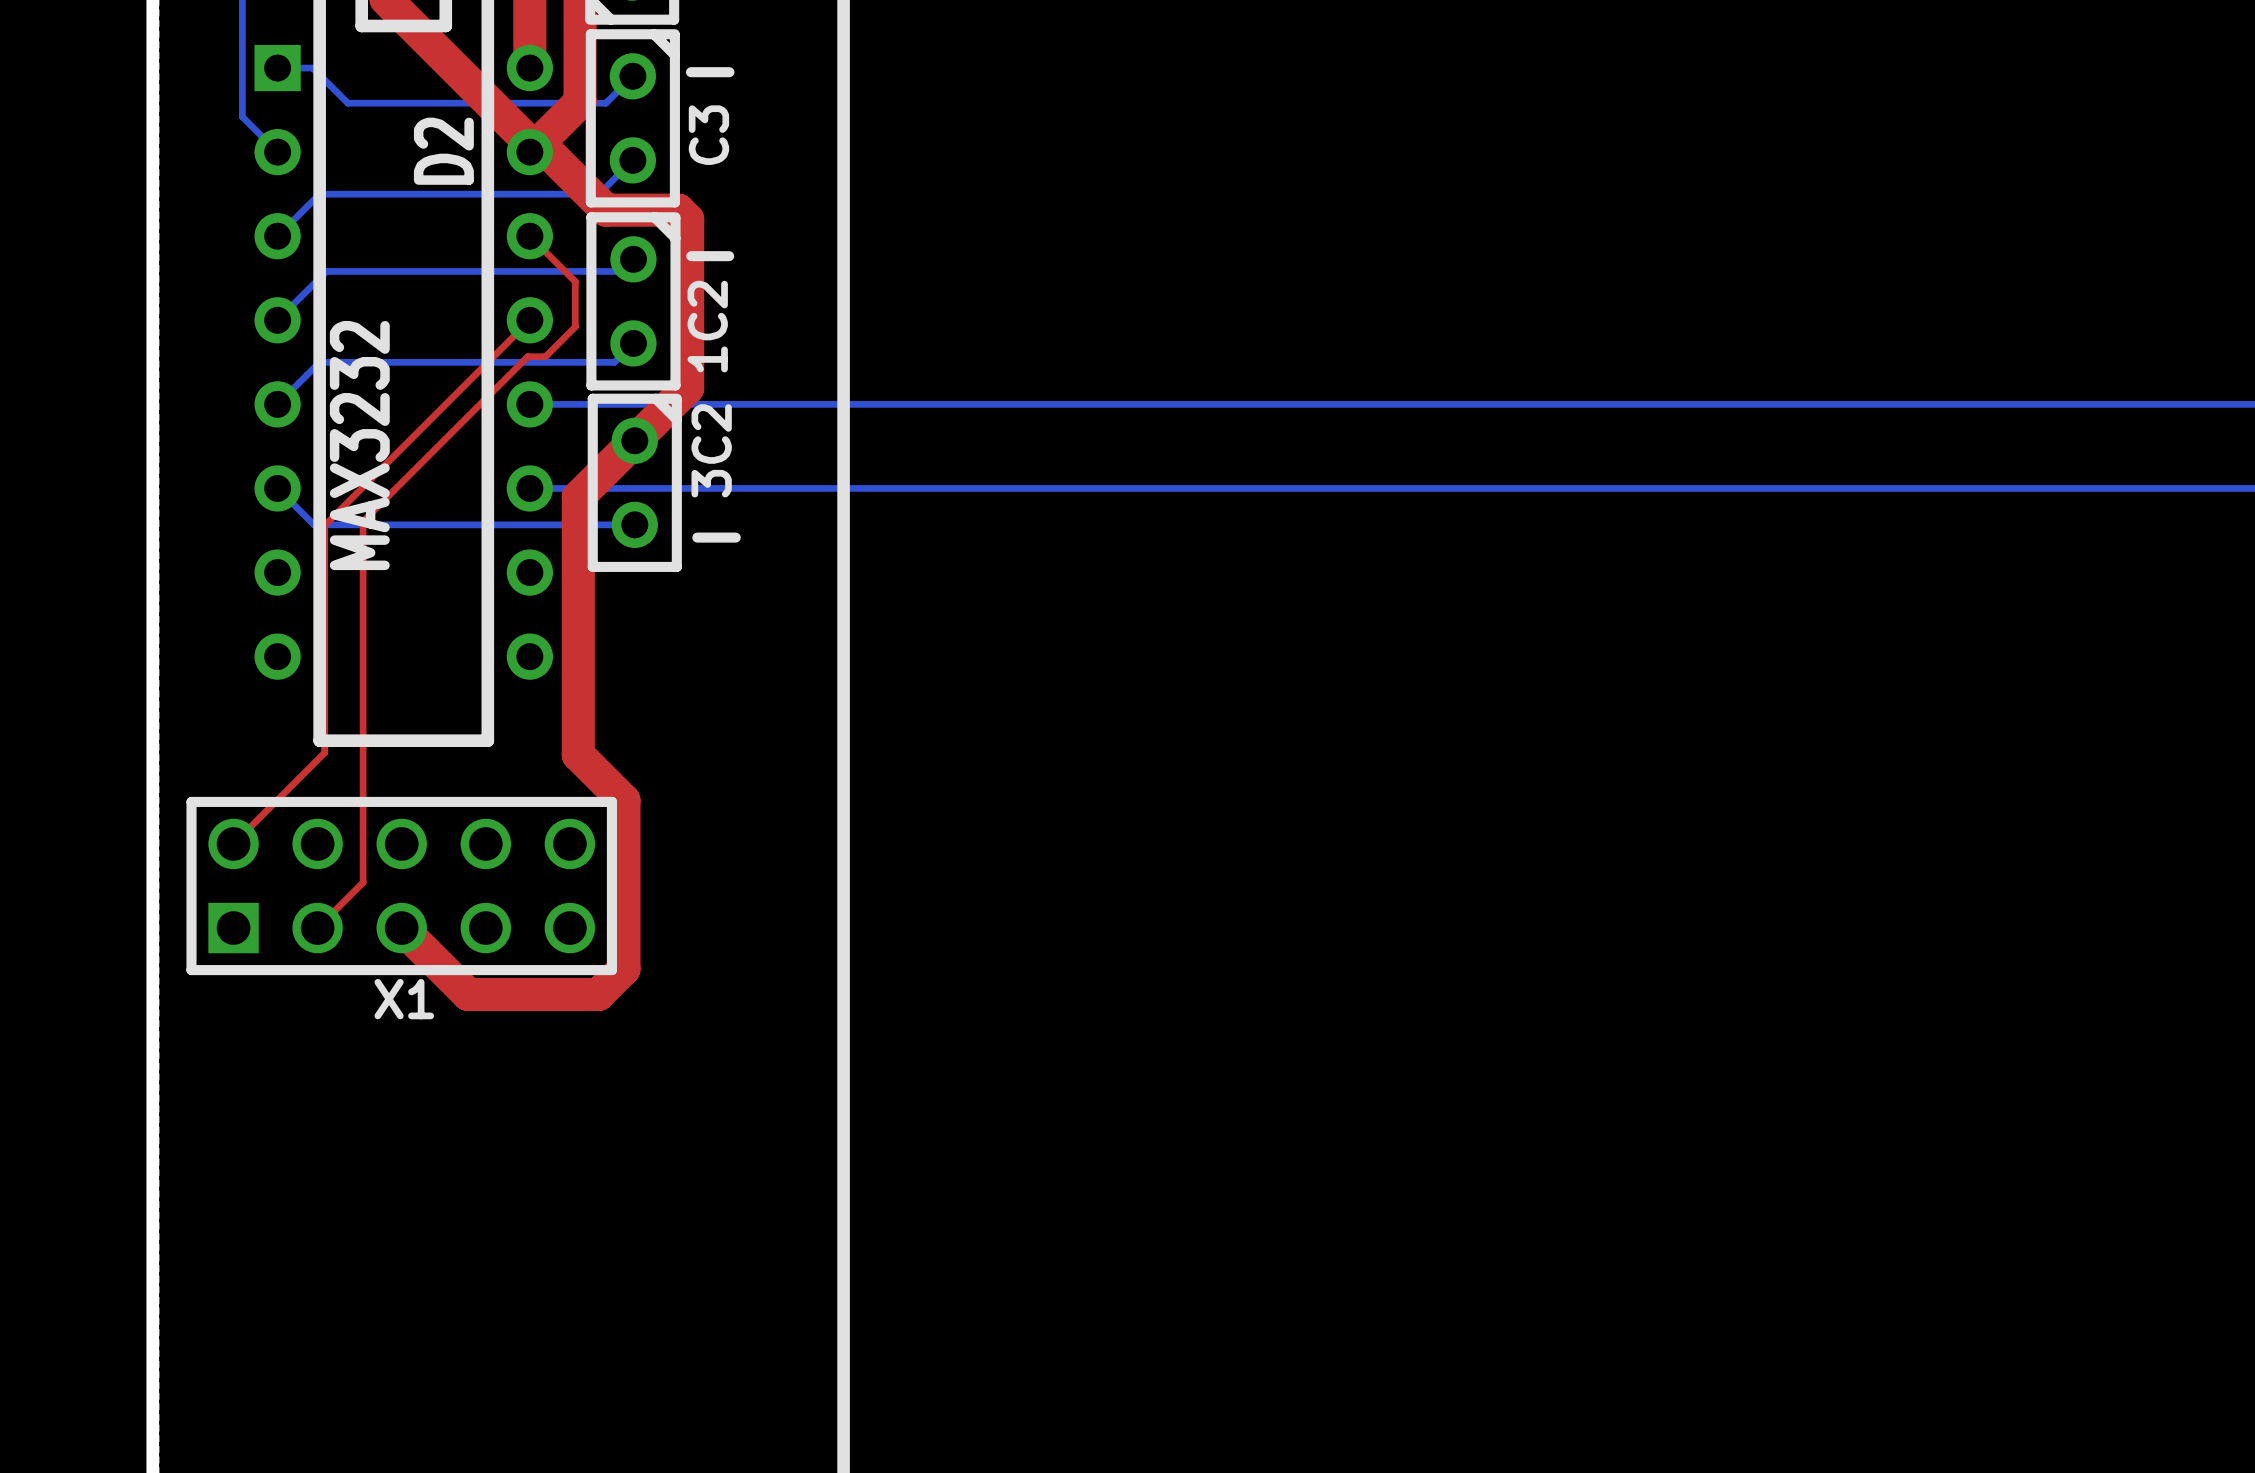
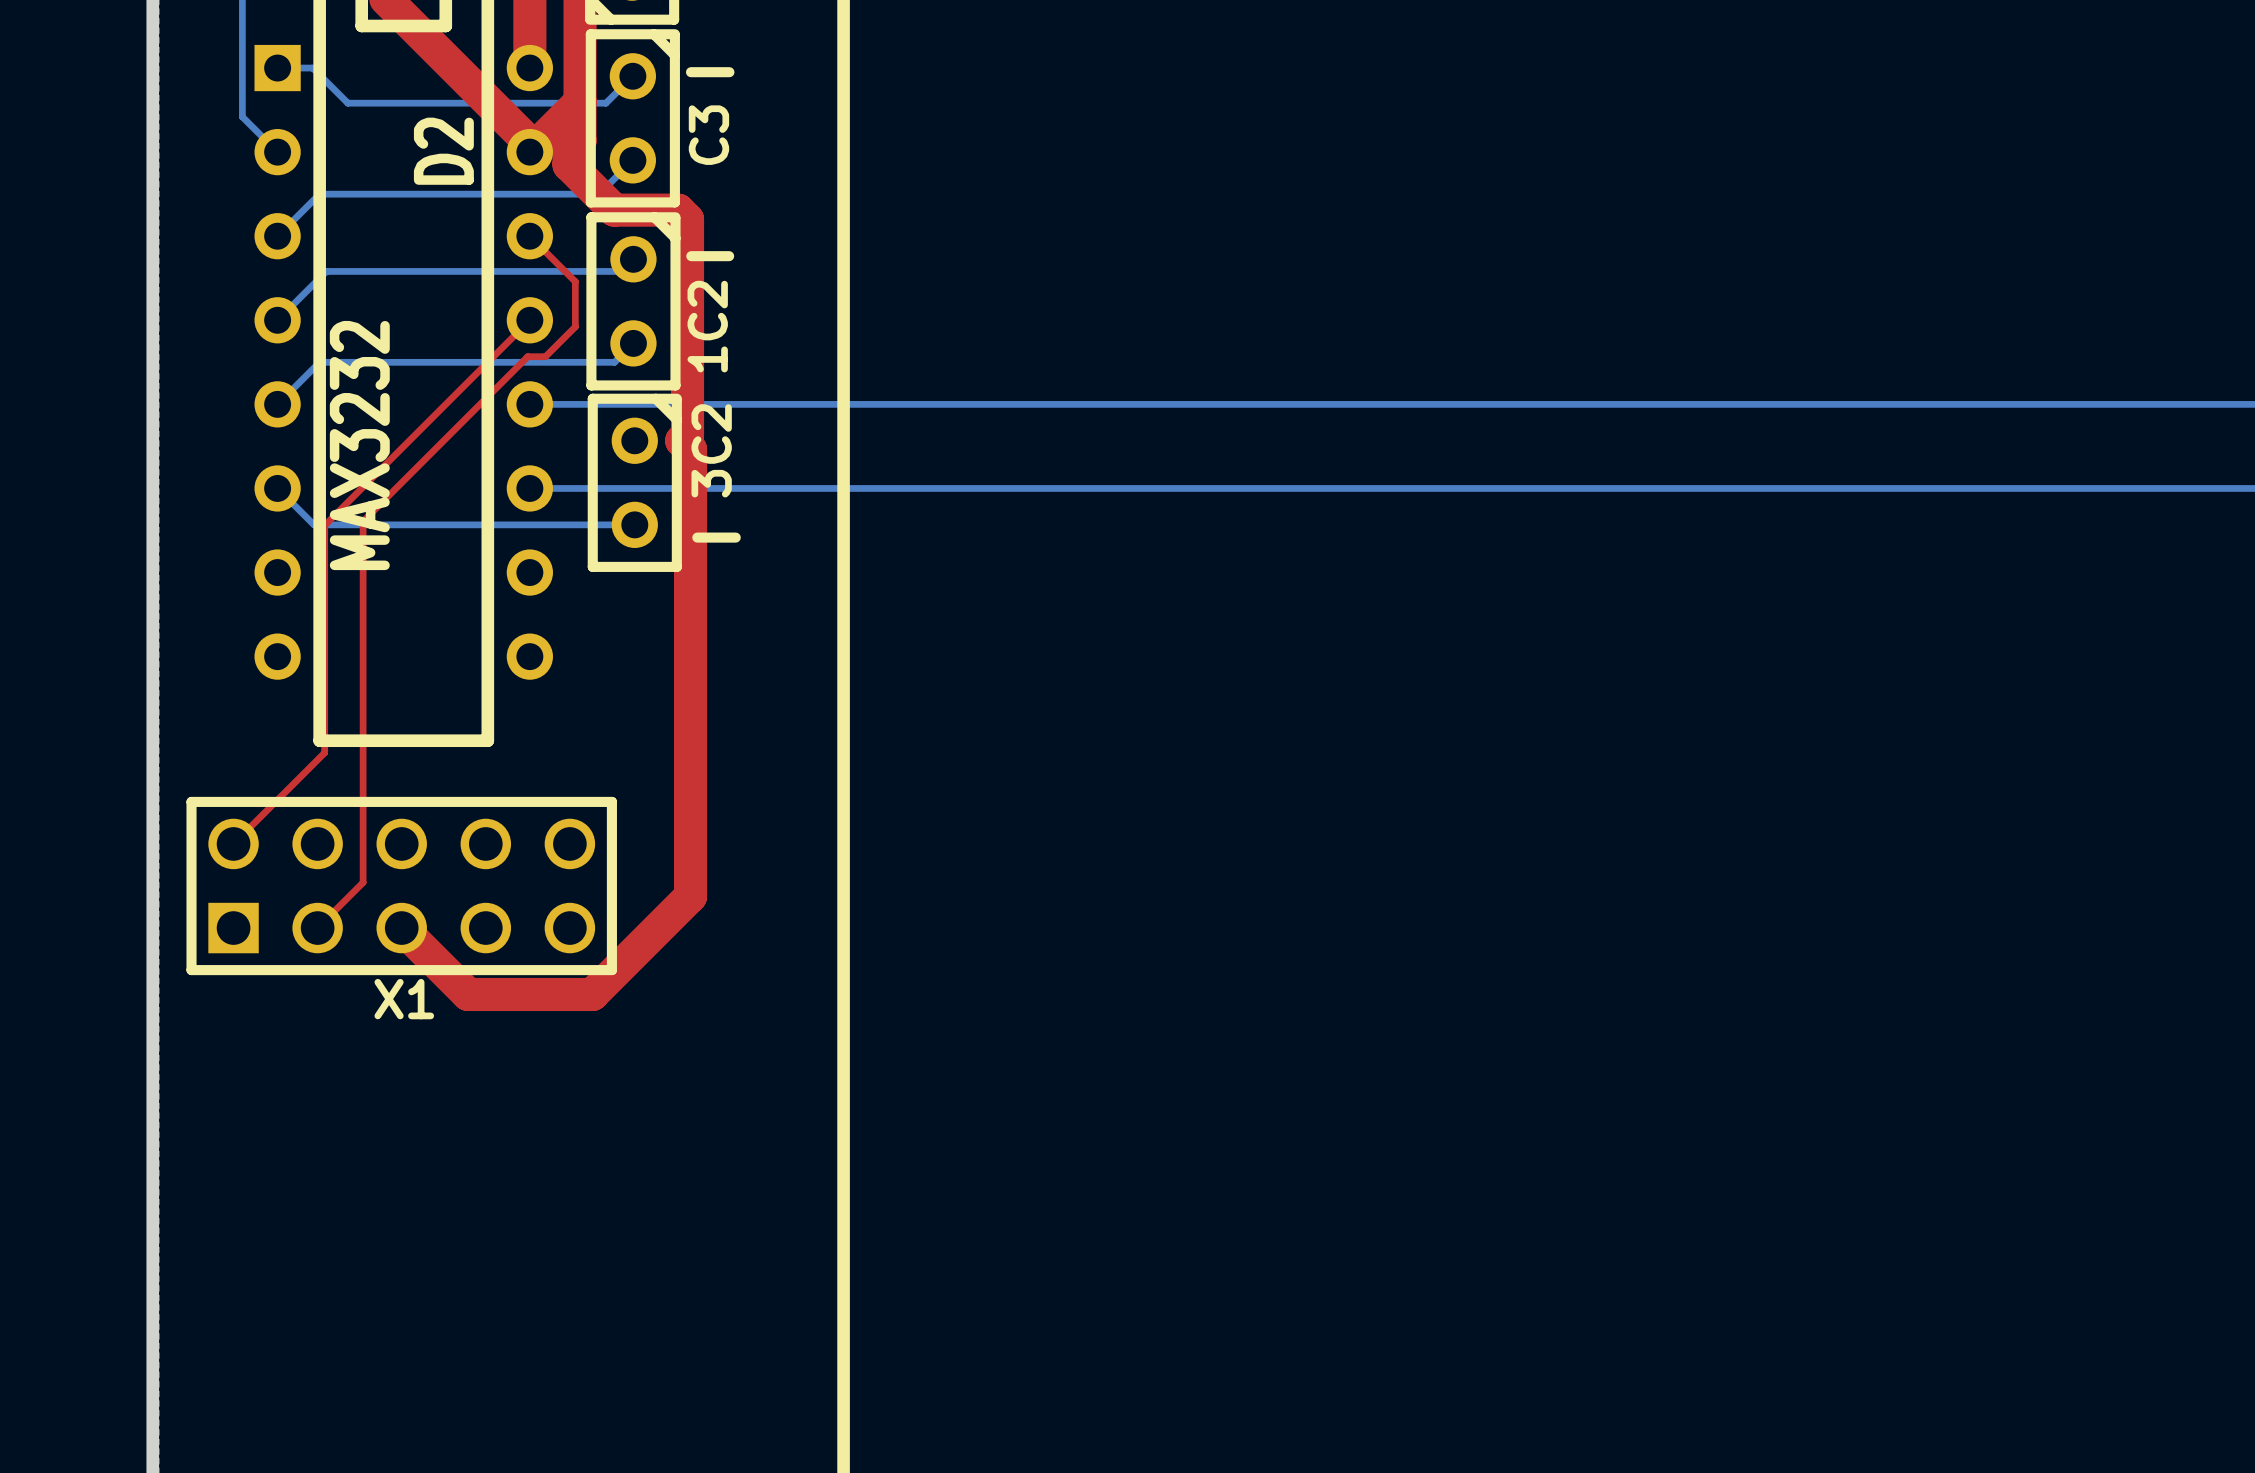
top track: (538, 143) (606, 210) (614, 210) -> (580, 101) (580, 141) (568, 152) (568, 164) (614, 210)
top track: (678, 210) (687, 219) (687, 387) (578, 497) (578, 754) (623, 800) (623, 968) (598, 994) (592, 994) -> (678, 210) (687, 219) (687, 434) (681, 440) (690, 449) (690, 896) (592, 994)

